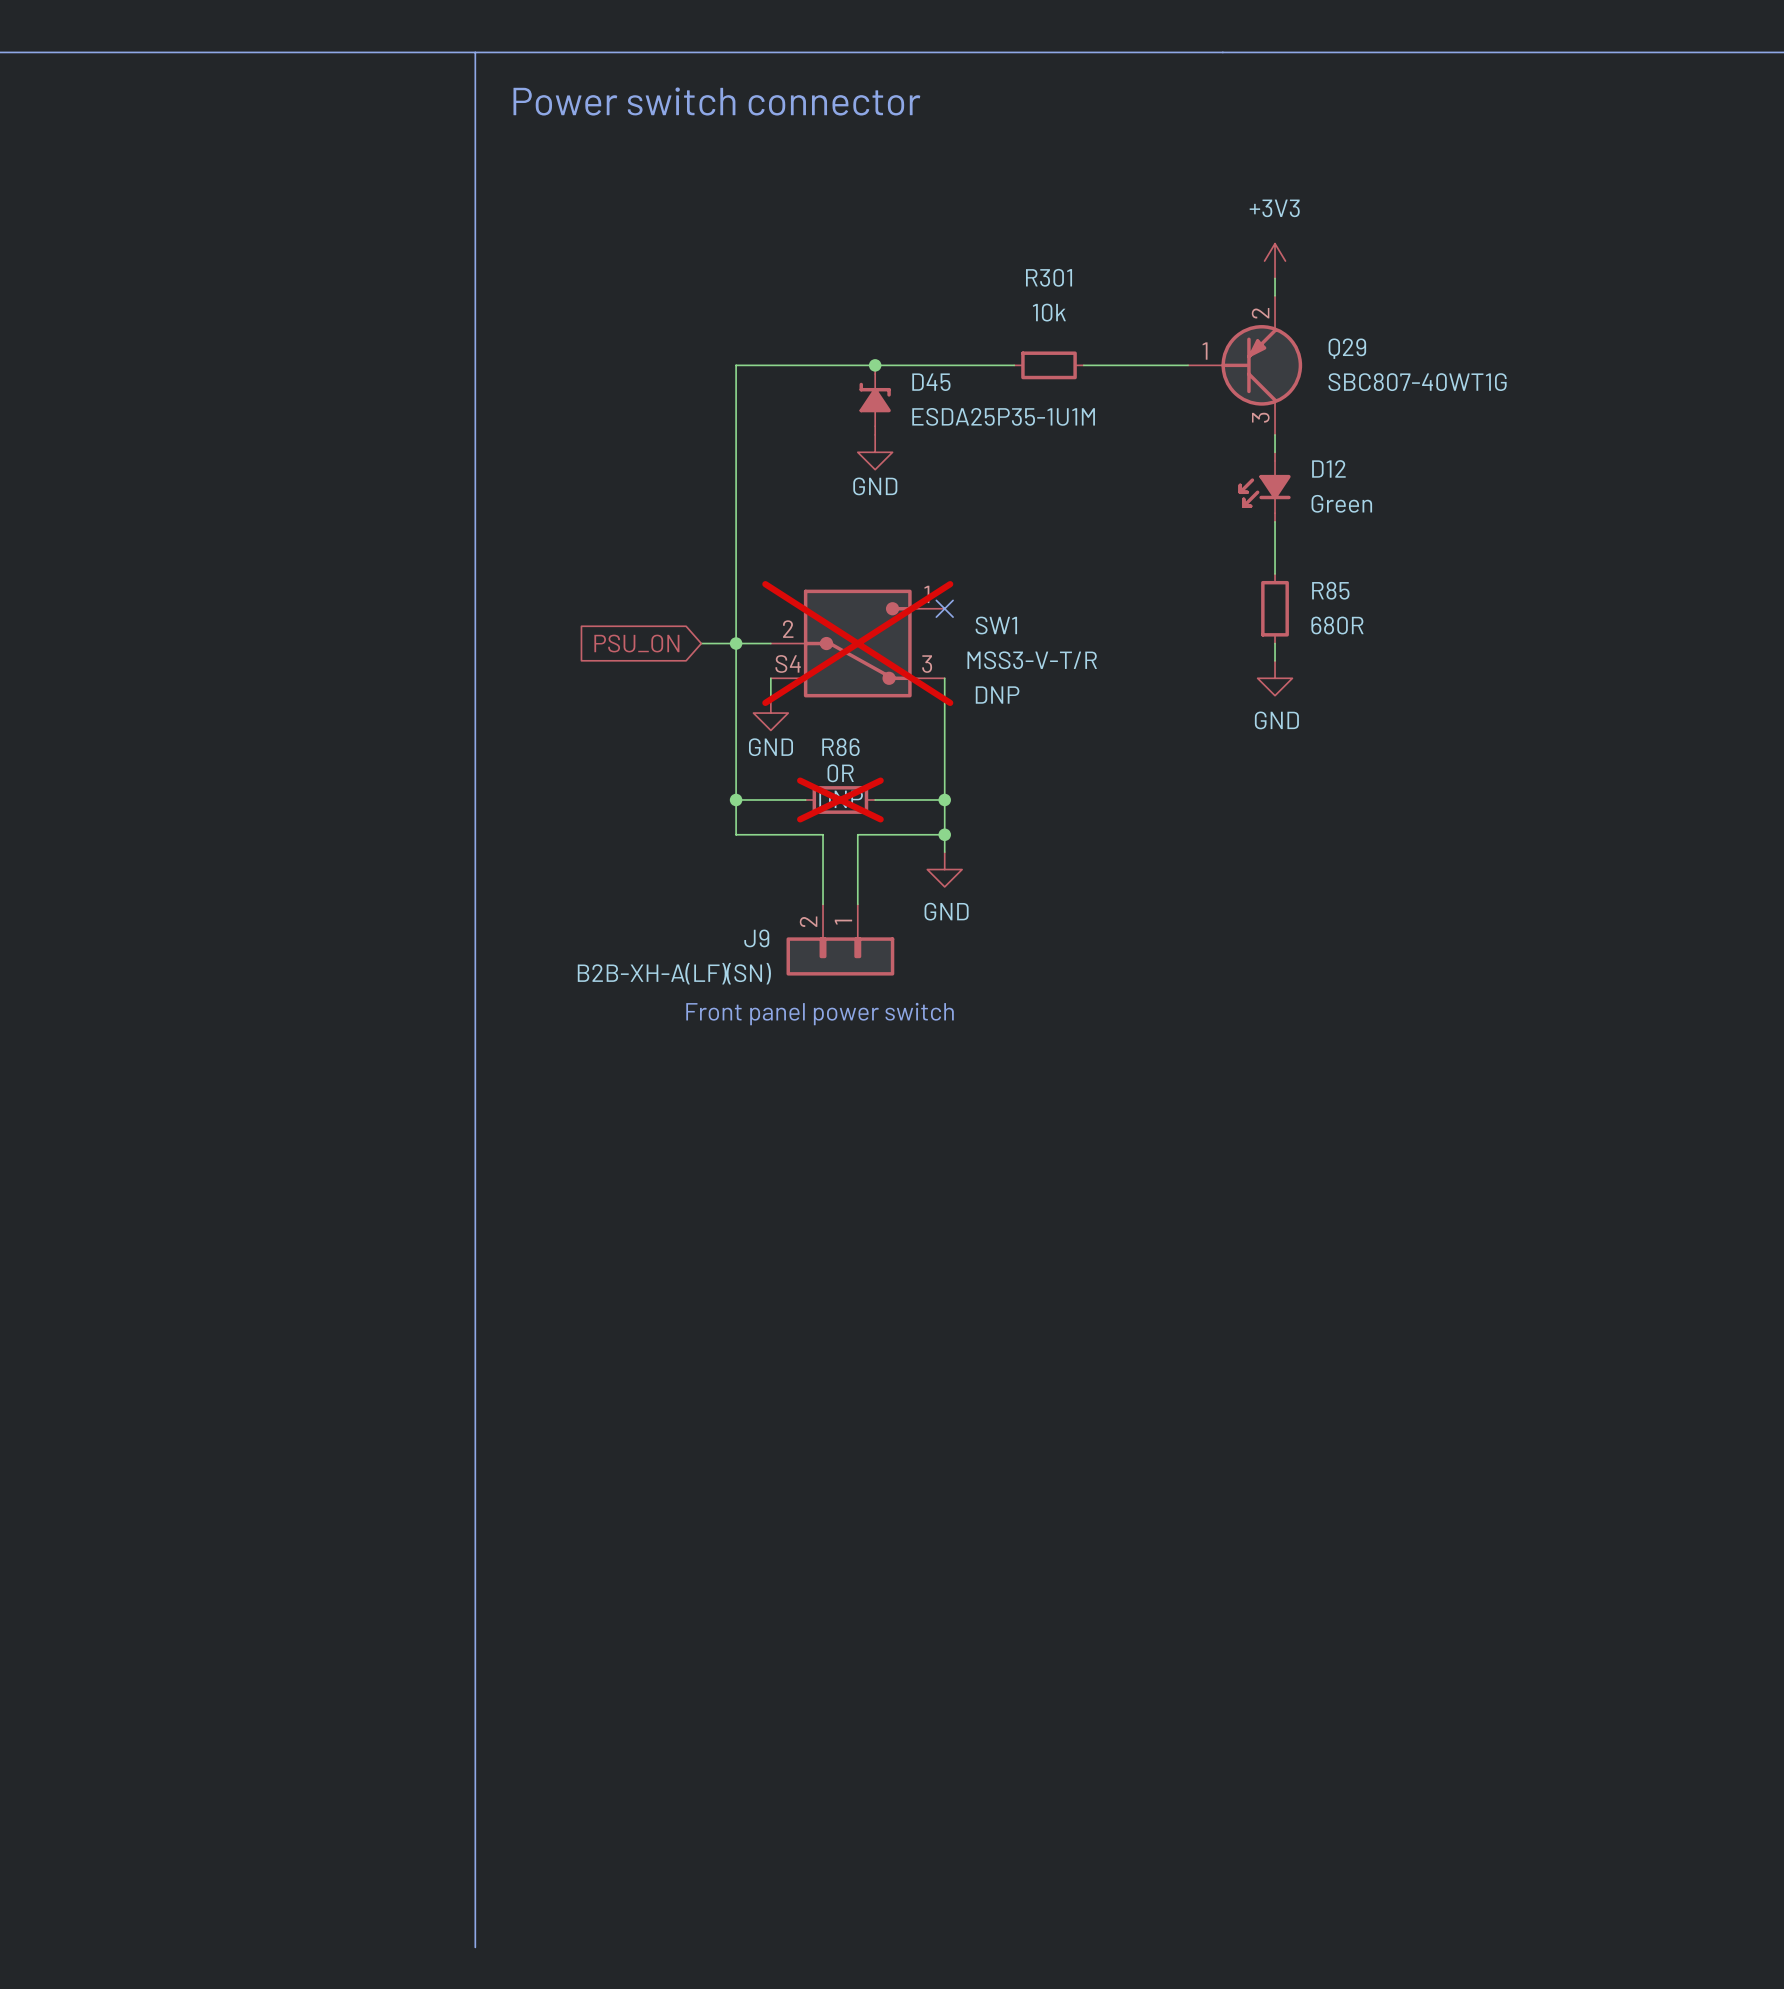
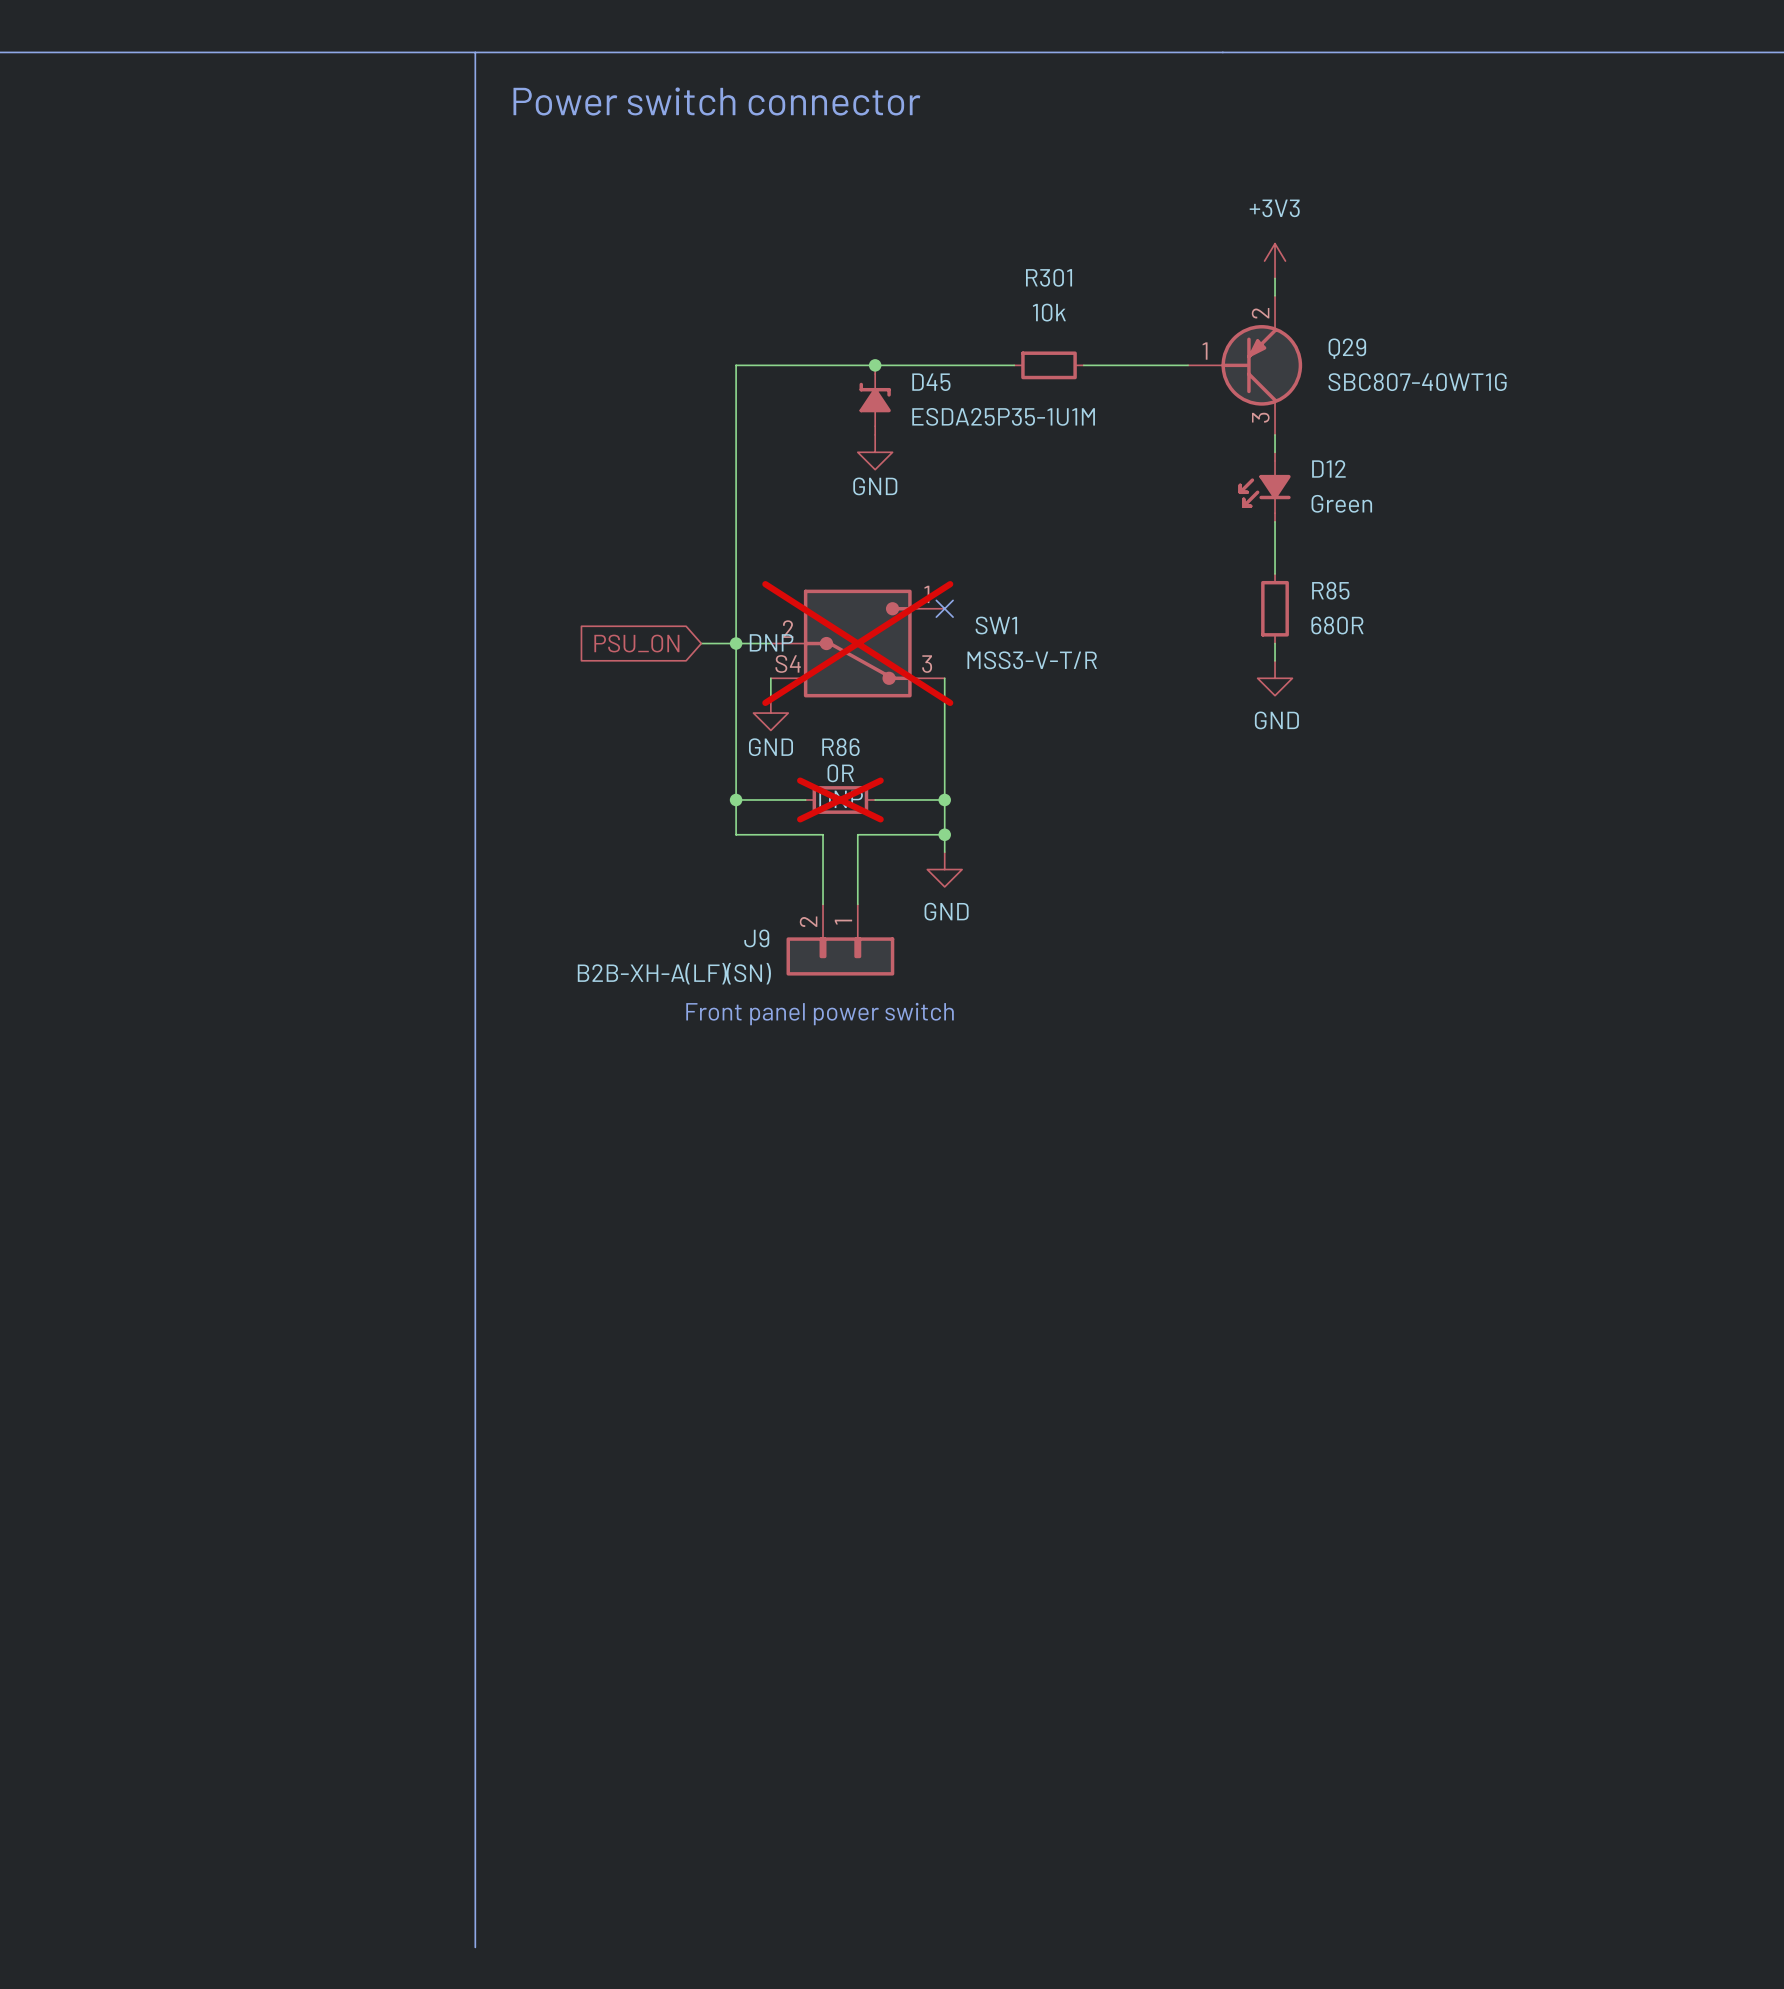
SW1 text position: DNP (997, 695) -> DNP (771, 642)

